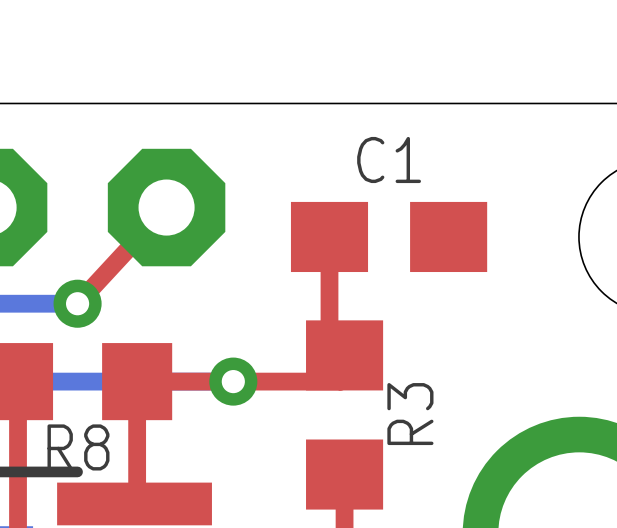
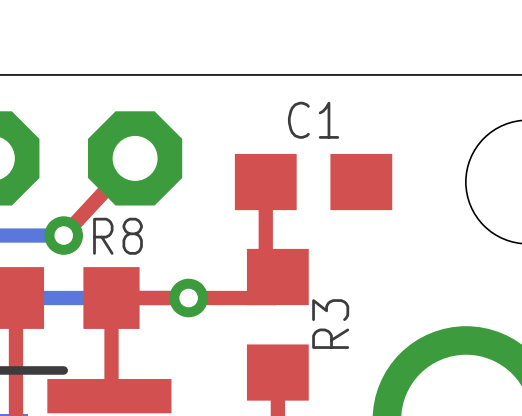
R8 name position: R8 (78, 447) -> R8 (117, 236)

